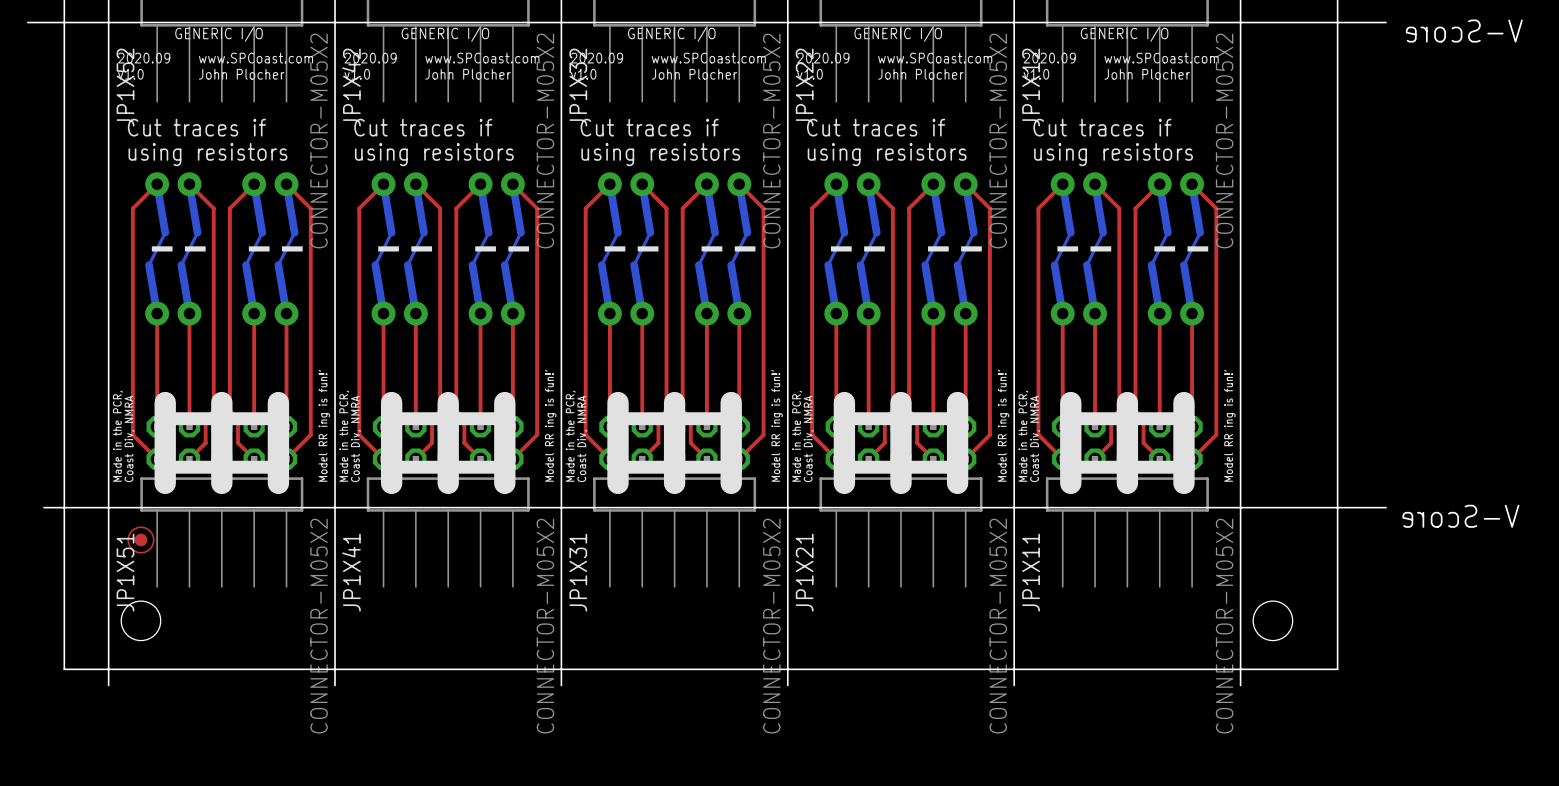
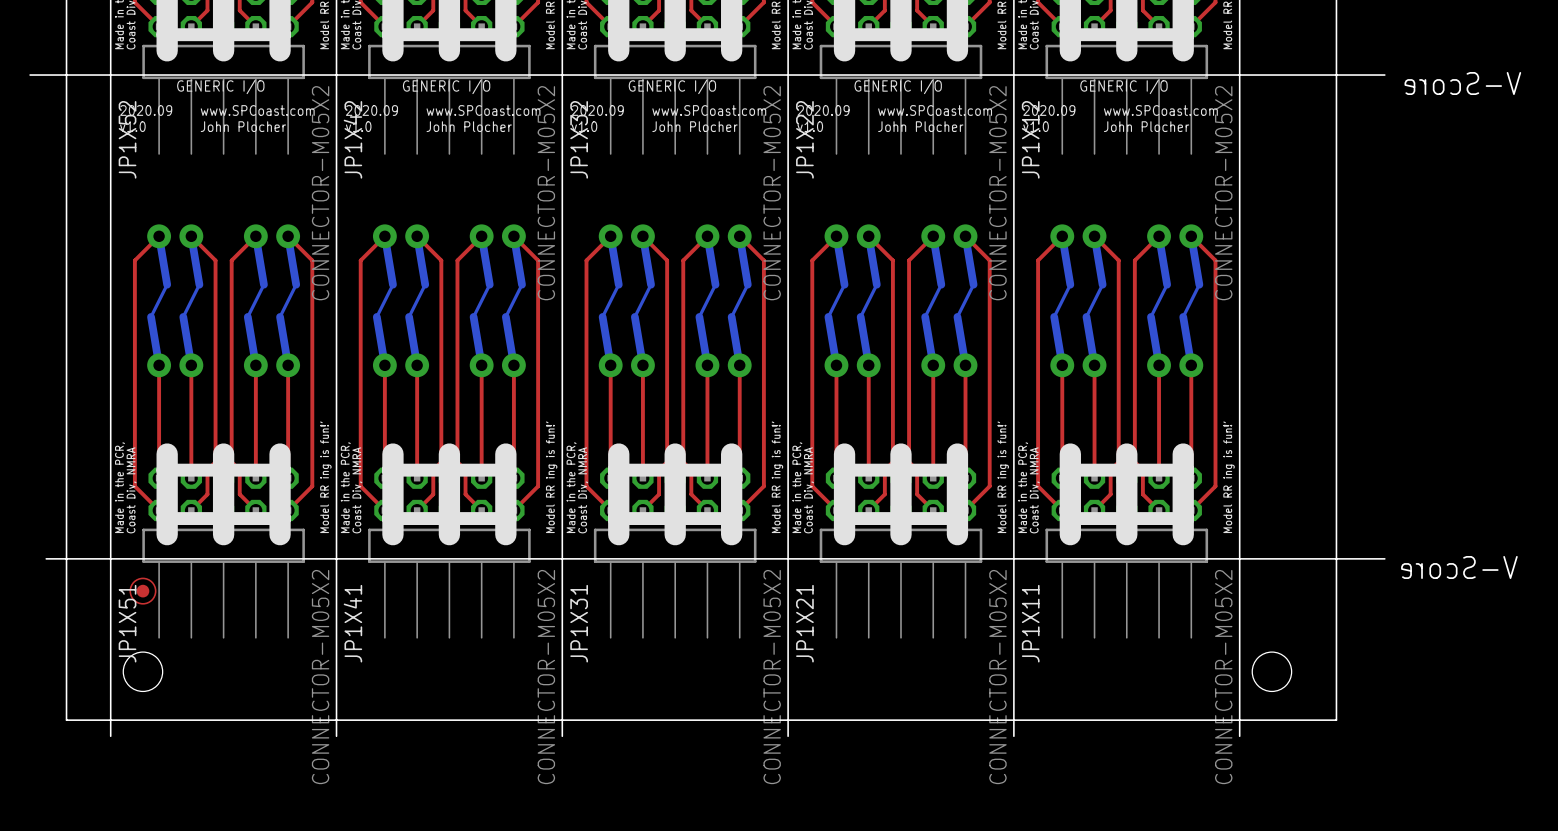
text: Cut traces if (196, 127) -> none
text: Cut traces if (423, 127) -> none
text: Cut traces if (649, 127) -> none
text: Cut traces if (876, 127) -> none
text: Cut traces if (1102, 127) -> none
text: using resistors (207, 154) -> none
text: using resistors (434, 154) -> none
text: using resistors (660, 154) -> none
text: using resistors (887, 154) -> none
text: using resistors (1113, 154) -> none
line: (205, 248) (140, 248) -> none
line: (302, 248) (237, 248) -> none
line: (432, 248) (367, 248) -> none
line: (529, 248) (464, 248) -> none
line: (658, 248) (593, 248) -> none
line: (755, 248) (690, 248) -> none
line: (884, 248) (820, 248) -> none
line: (981, 248) (917, 248) -> none
line: (1111, 248) (1046, 248) -> none
line: (1208, 248) (1143, 248) -> none

